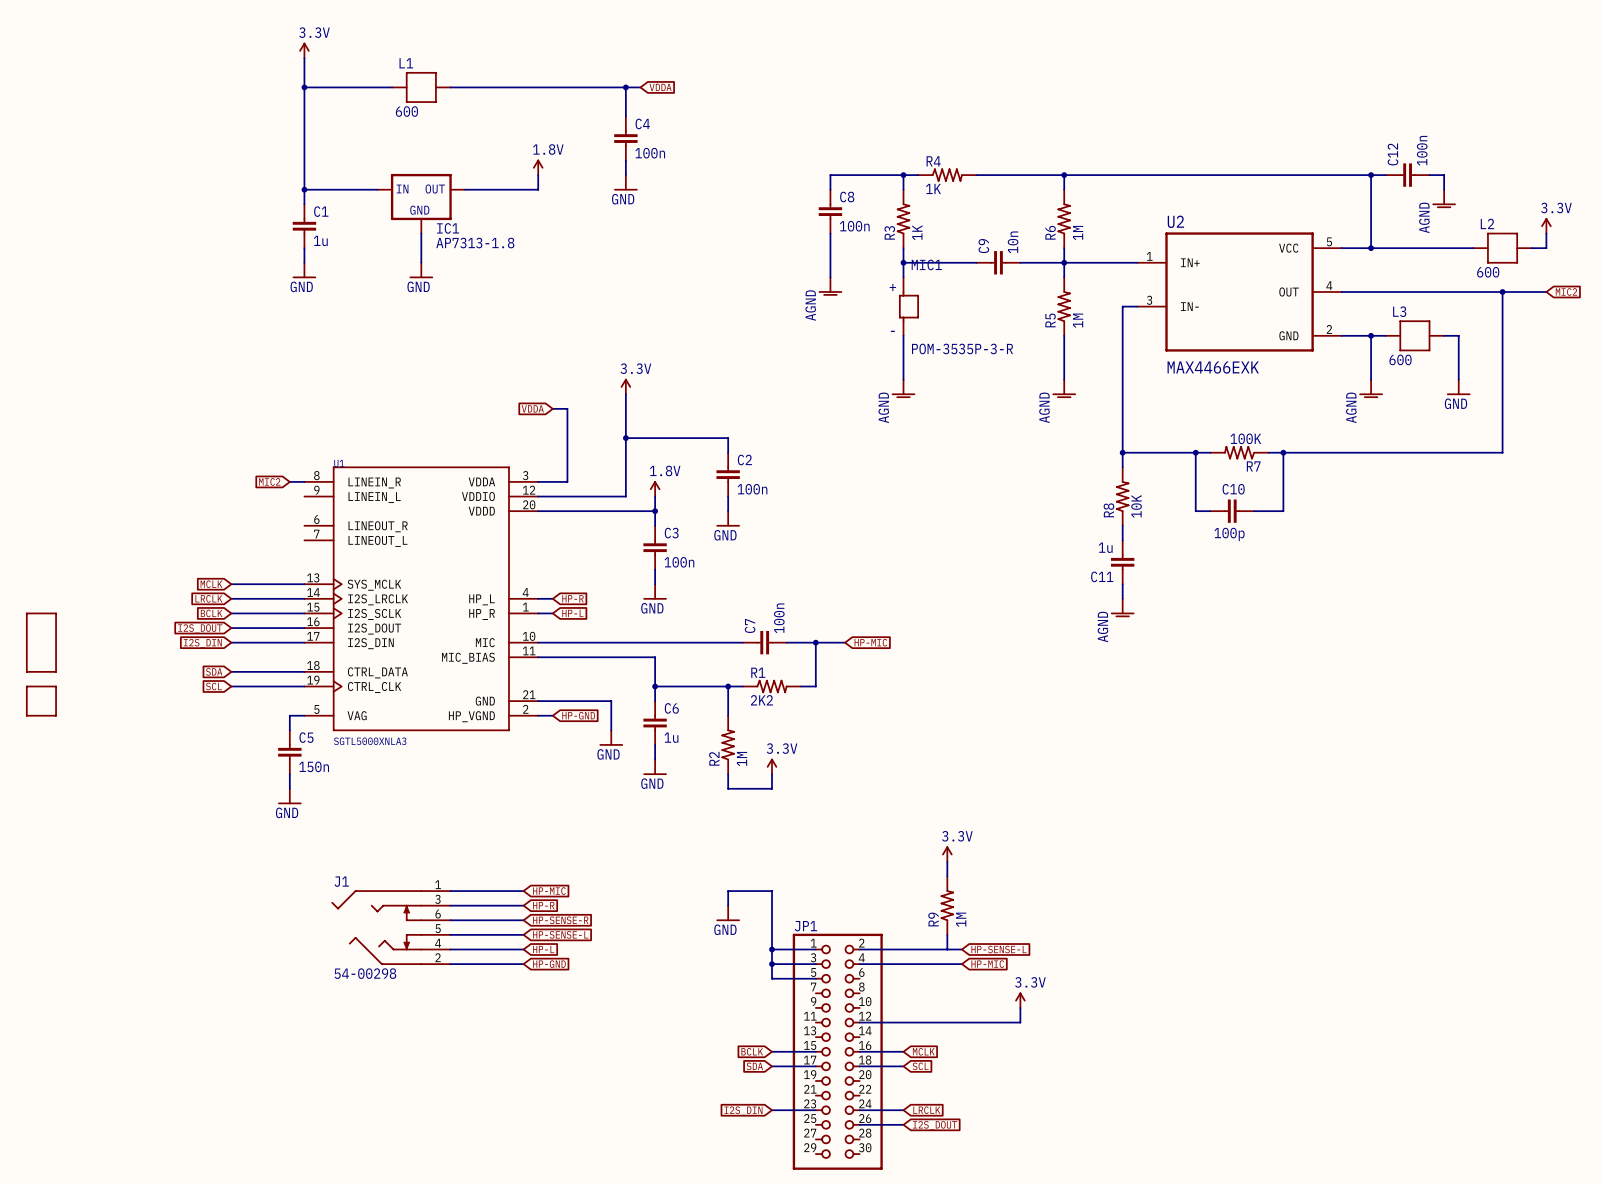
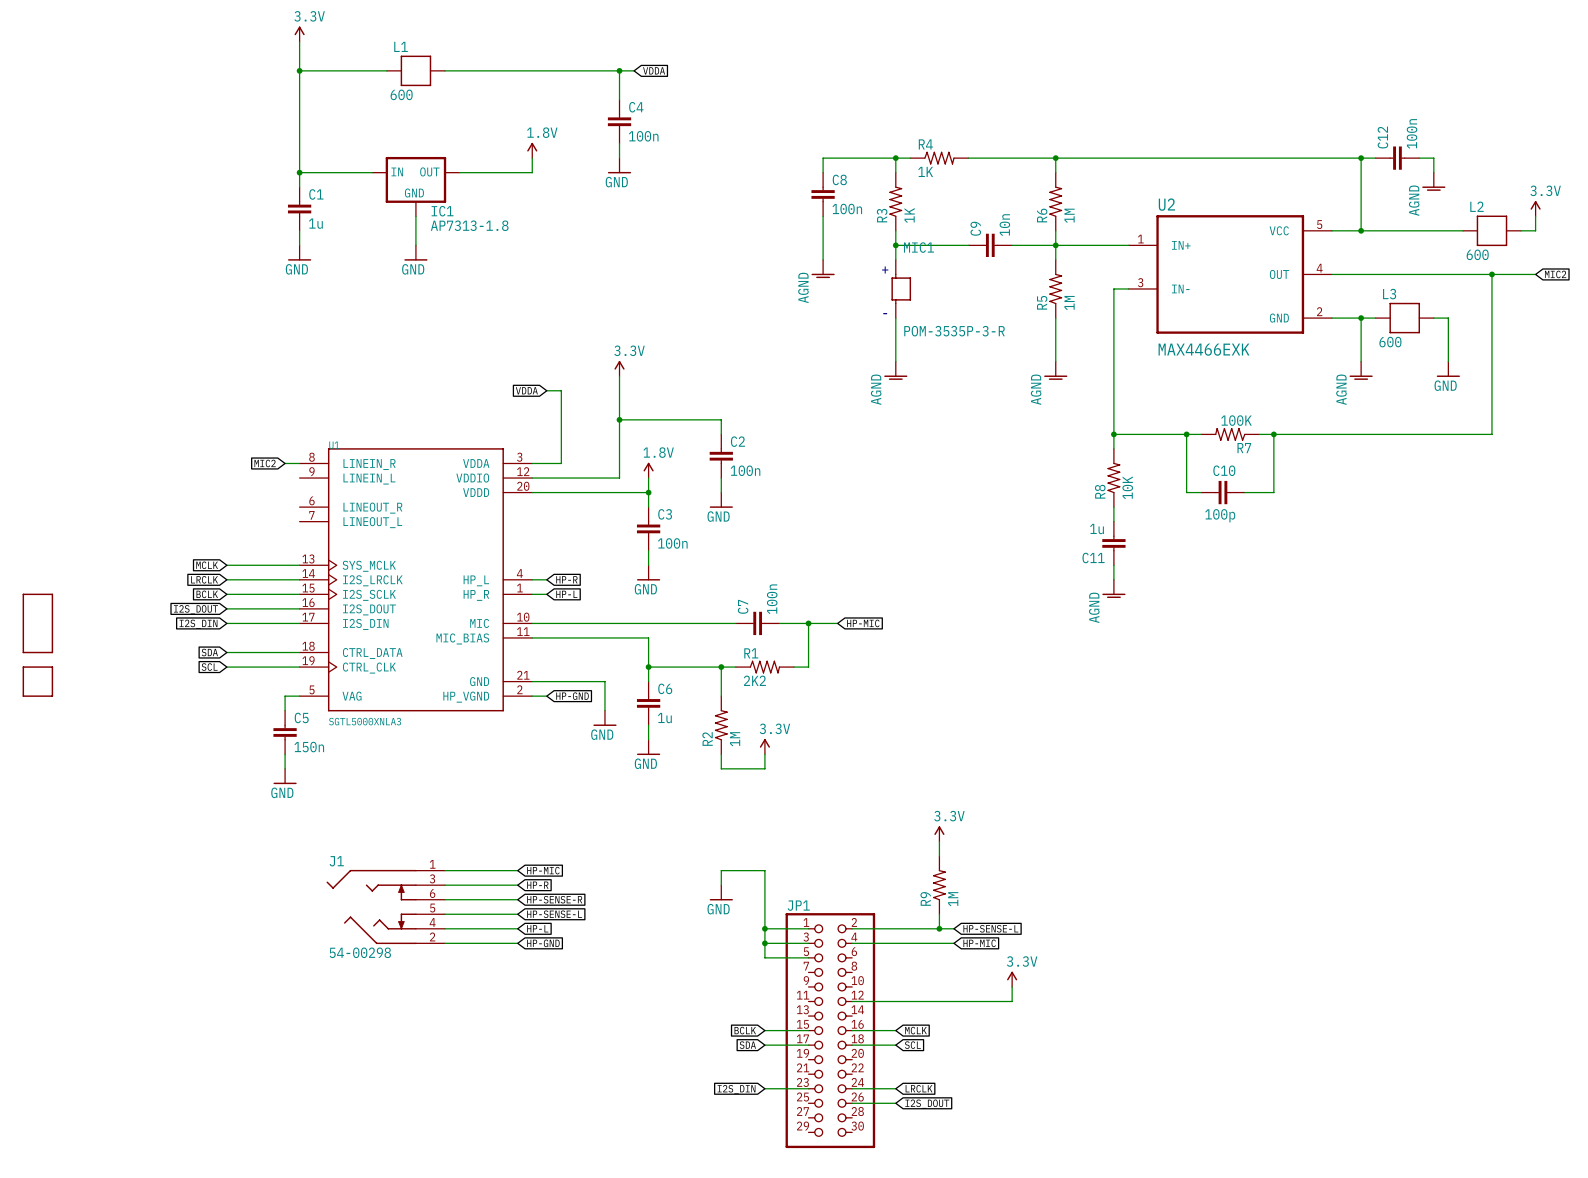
junction: none -> (939, 928)

